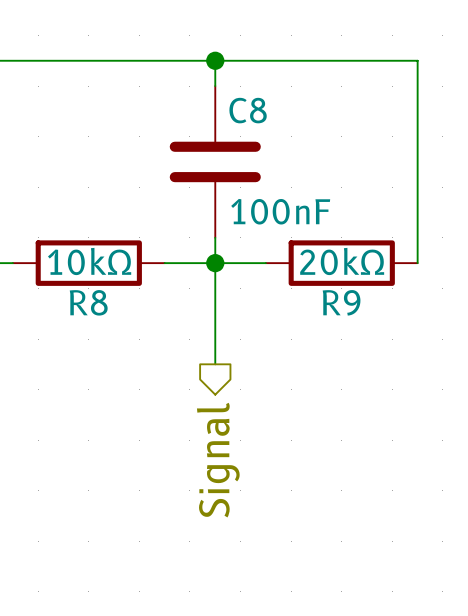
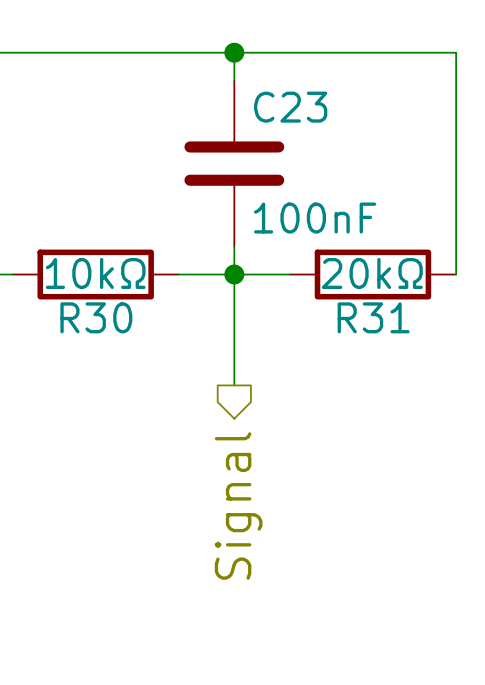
C8 name: C8 (248, 110) -> C23 (290, 107)
R8 name: R8 (88, 302) -> R30 (96, 317)
R9 name: R9 (341, 302) -> R31 (373, 317)

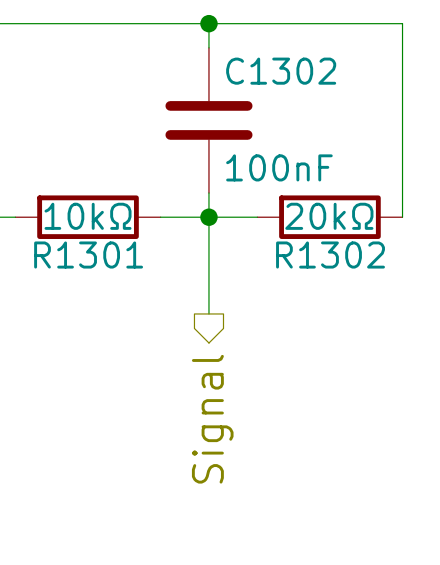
C23 name: C23 (290, 107) -> C1302 (281, 71)
R30 name: R30 (96, 317) -> R1301 (88, 255)
R31 name: R31 (373, 317) -> R1302 (330, 255)

